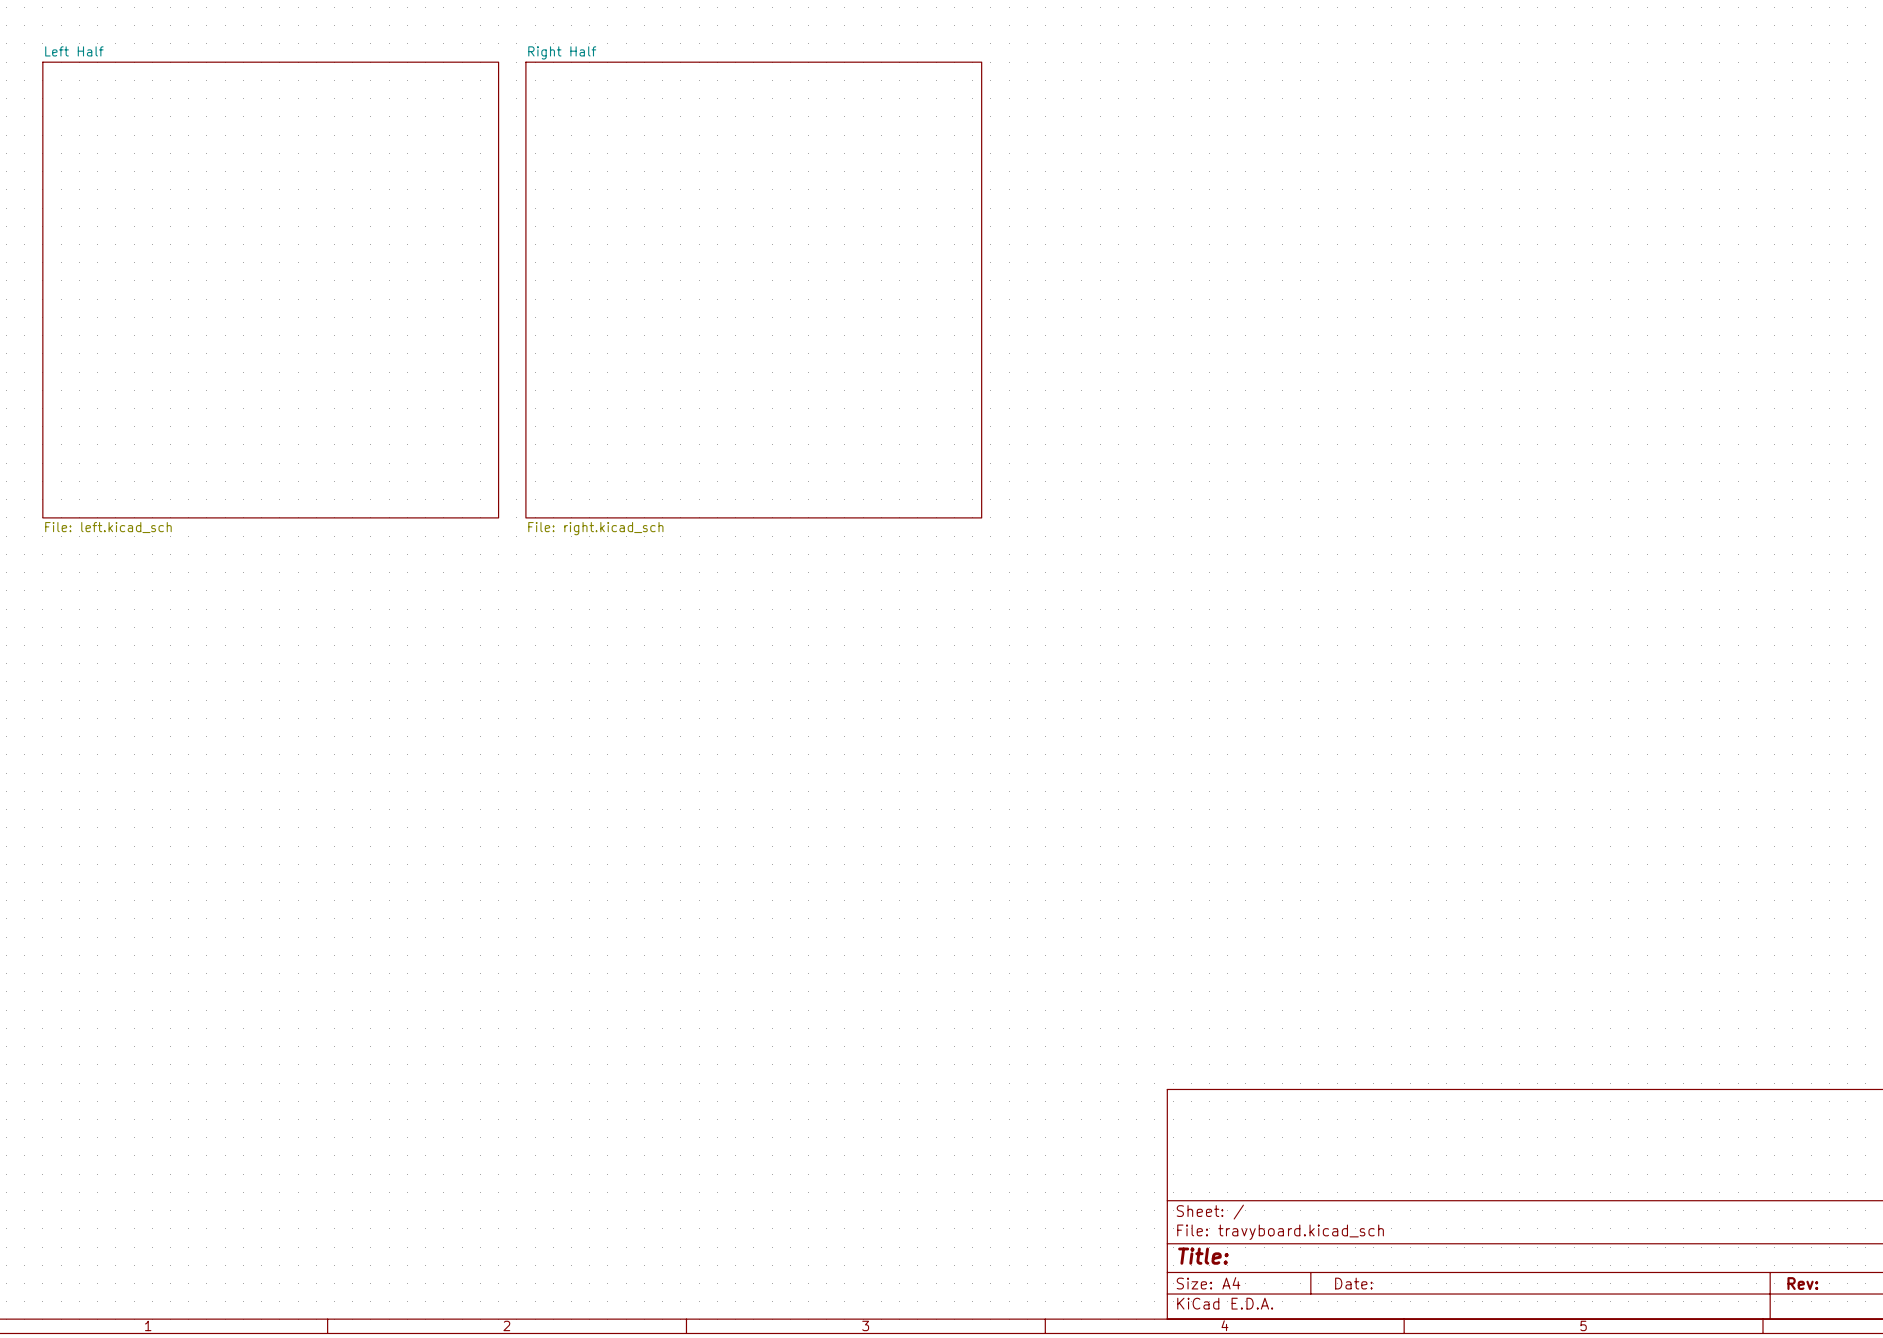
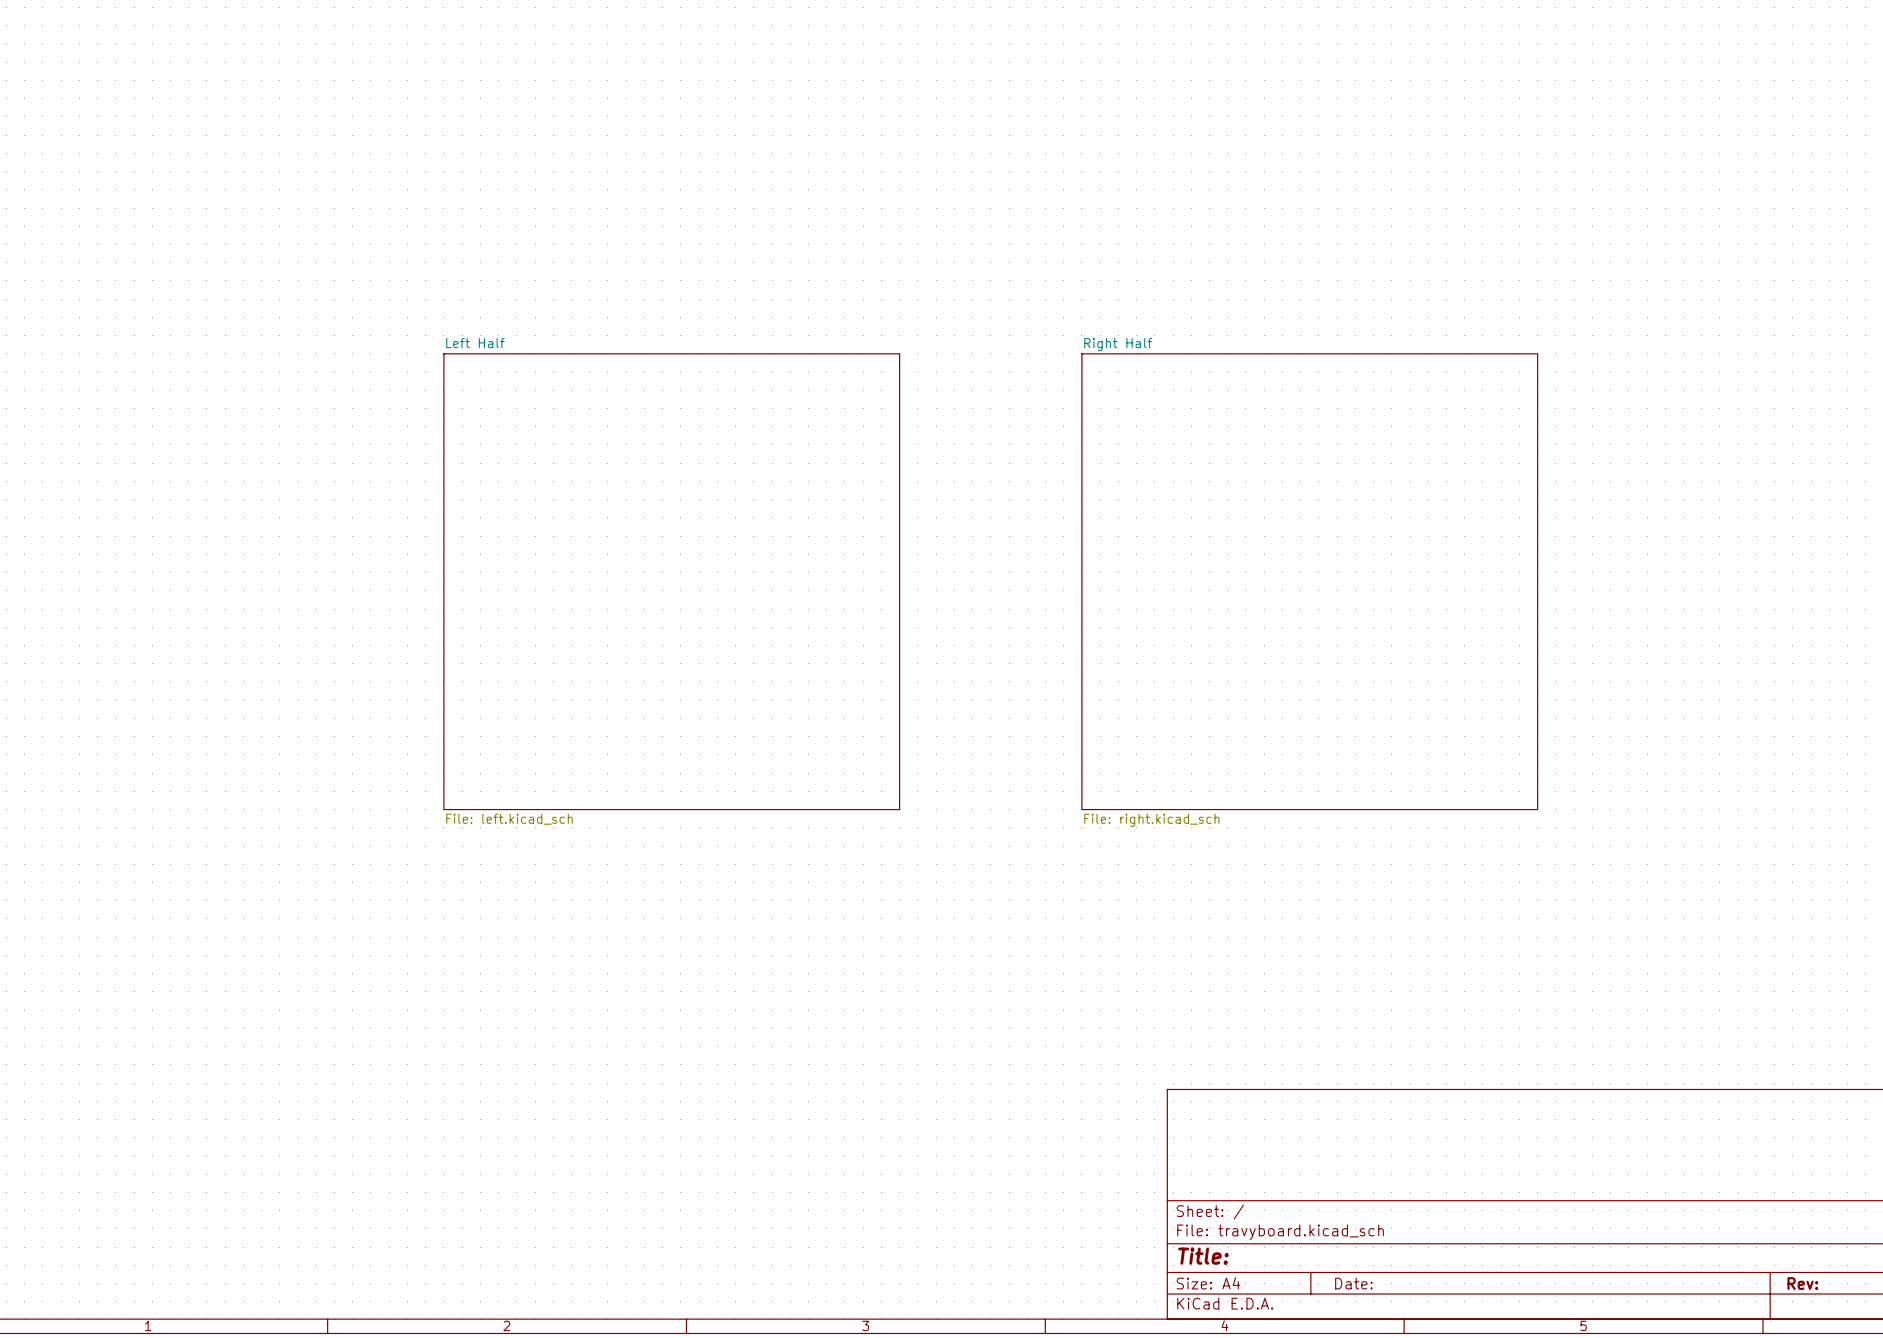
sheet Left Half: File: left.kicad_sch (270, 290) -> none
sheet Right Half: File: right.kicad_sch (753, 290) -> none
sheet Left Half: none -> File: left.kicad_sch (671, 581)
sheet Right Half: none -> File: right.kicad_sch (1309, 581)

